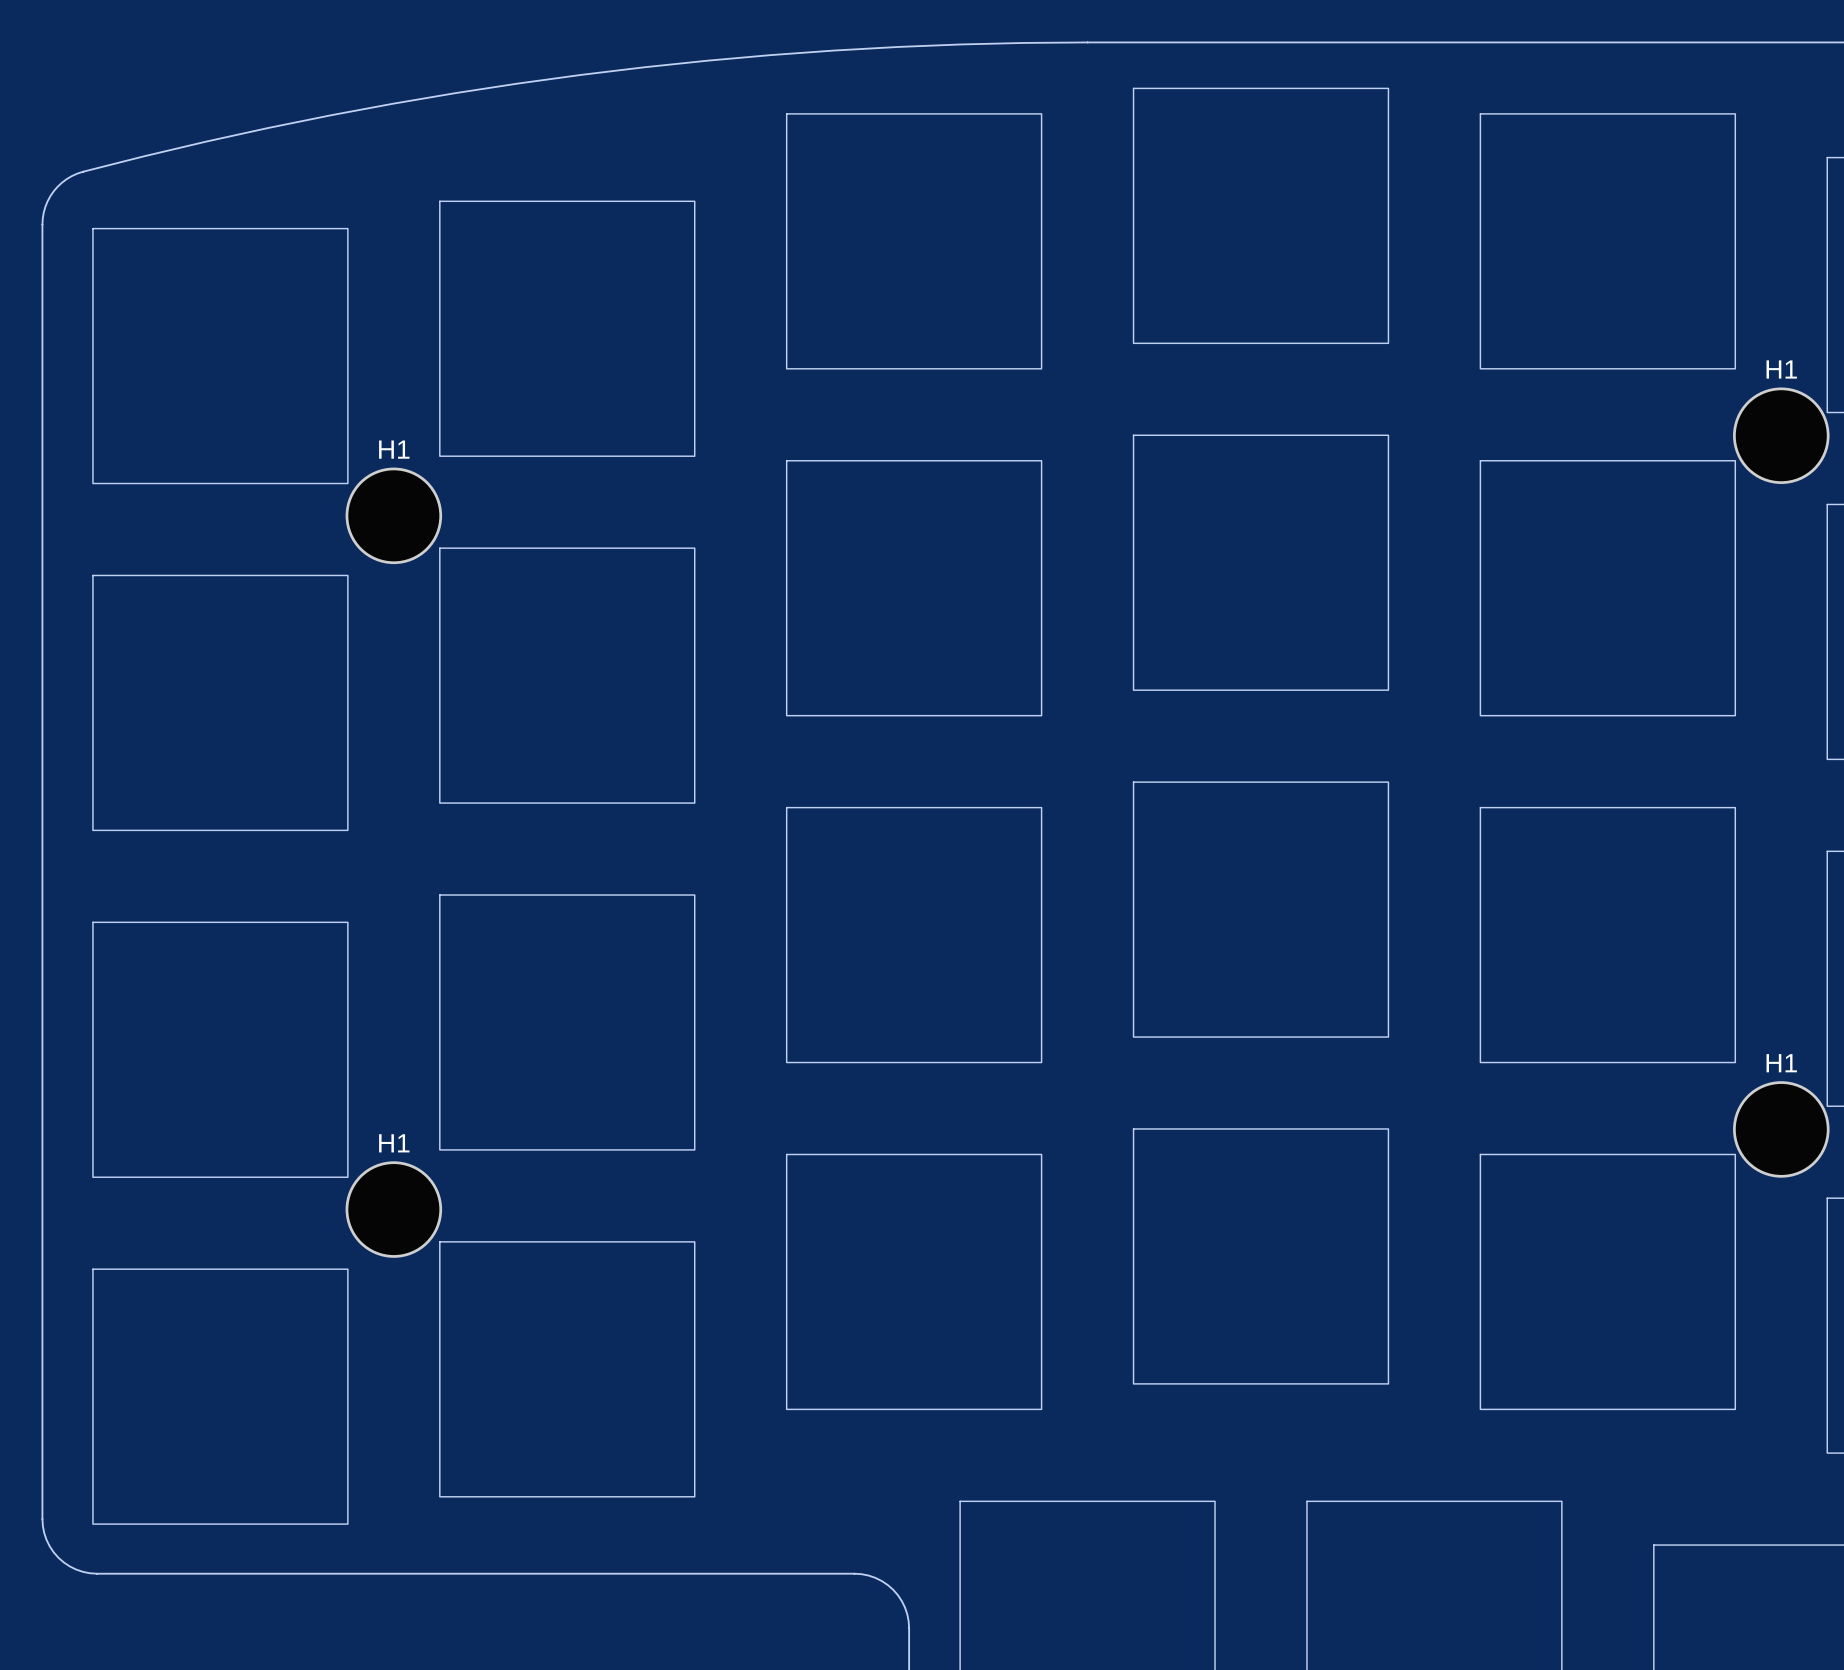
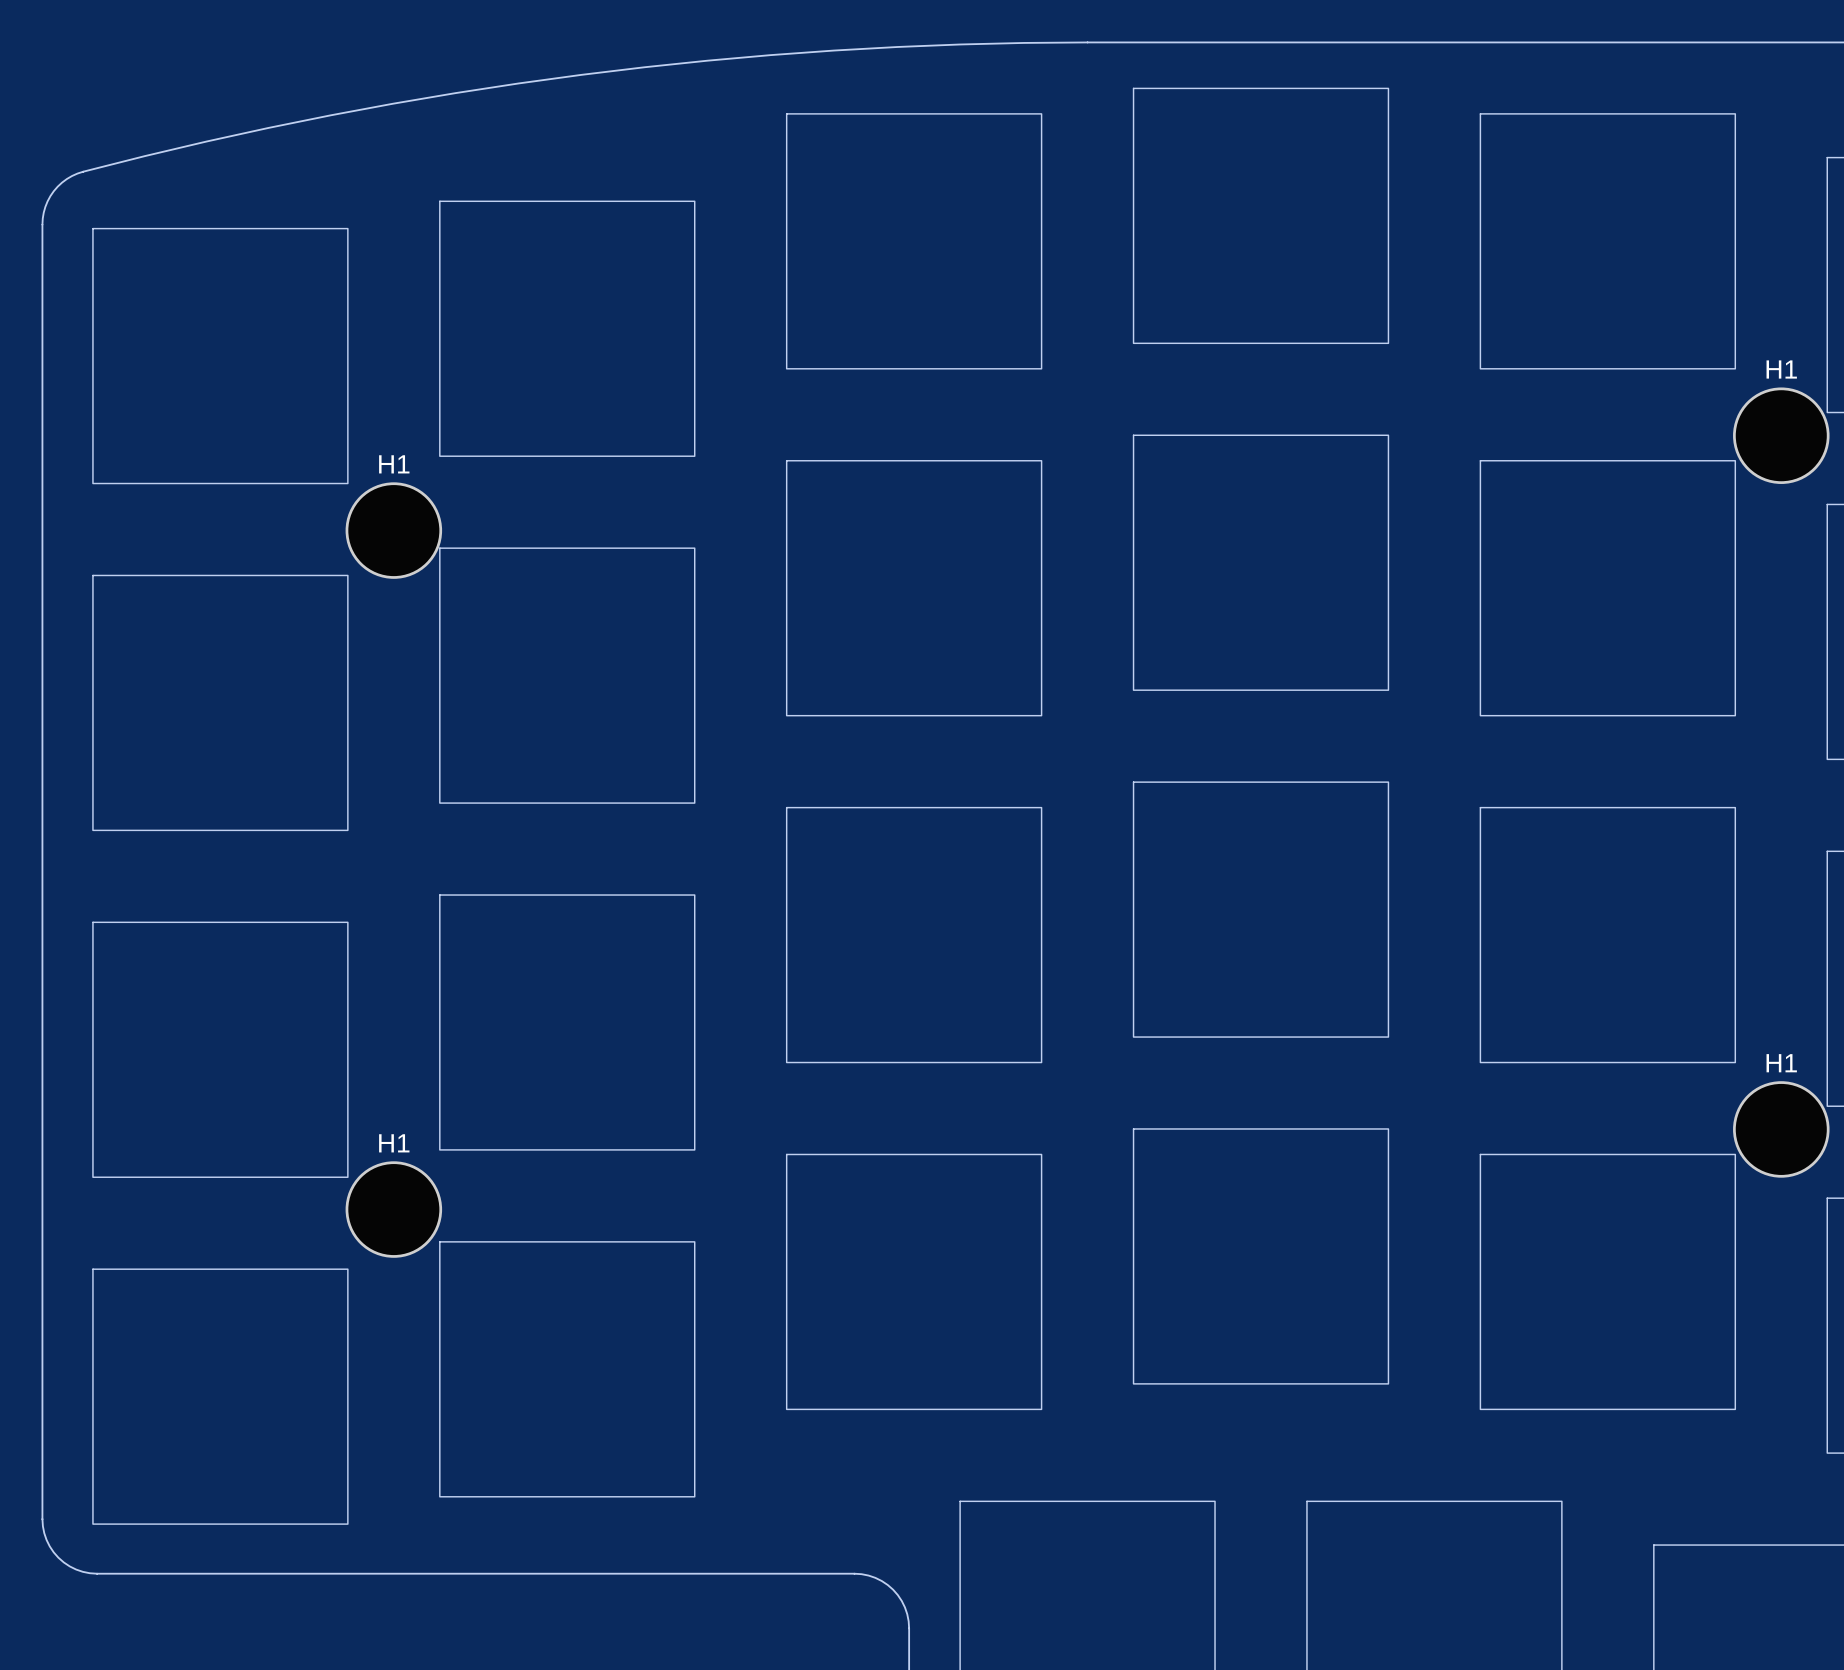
H1 position: (393, 515) -> (393, 530)

